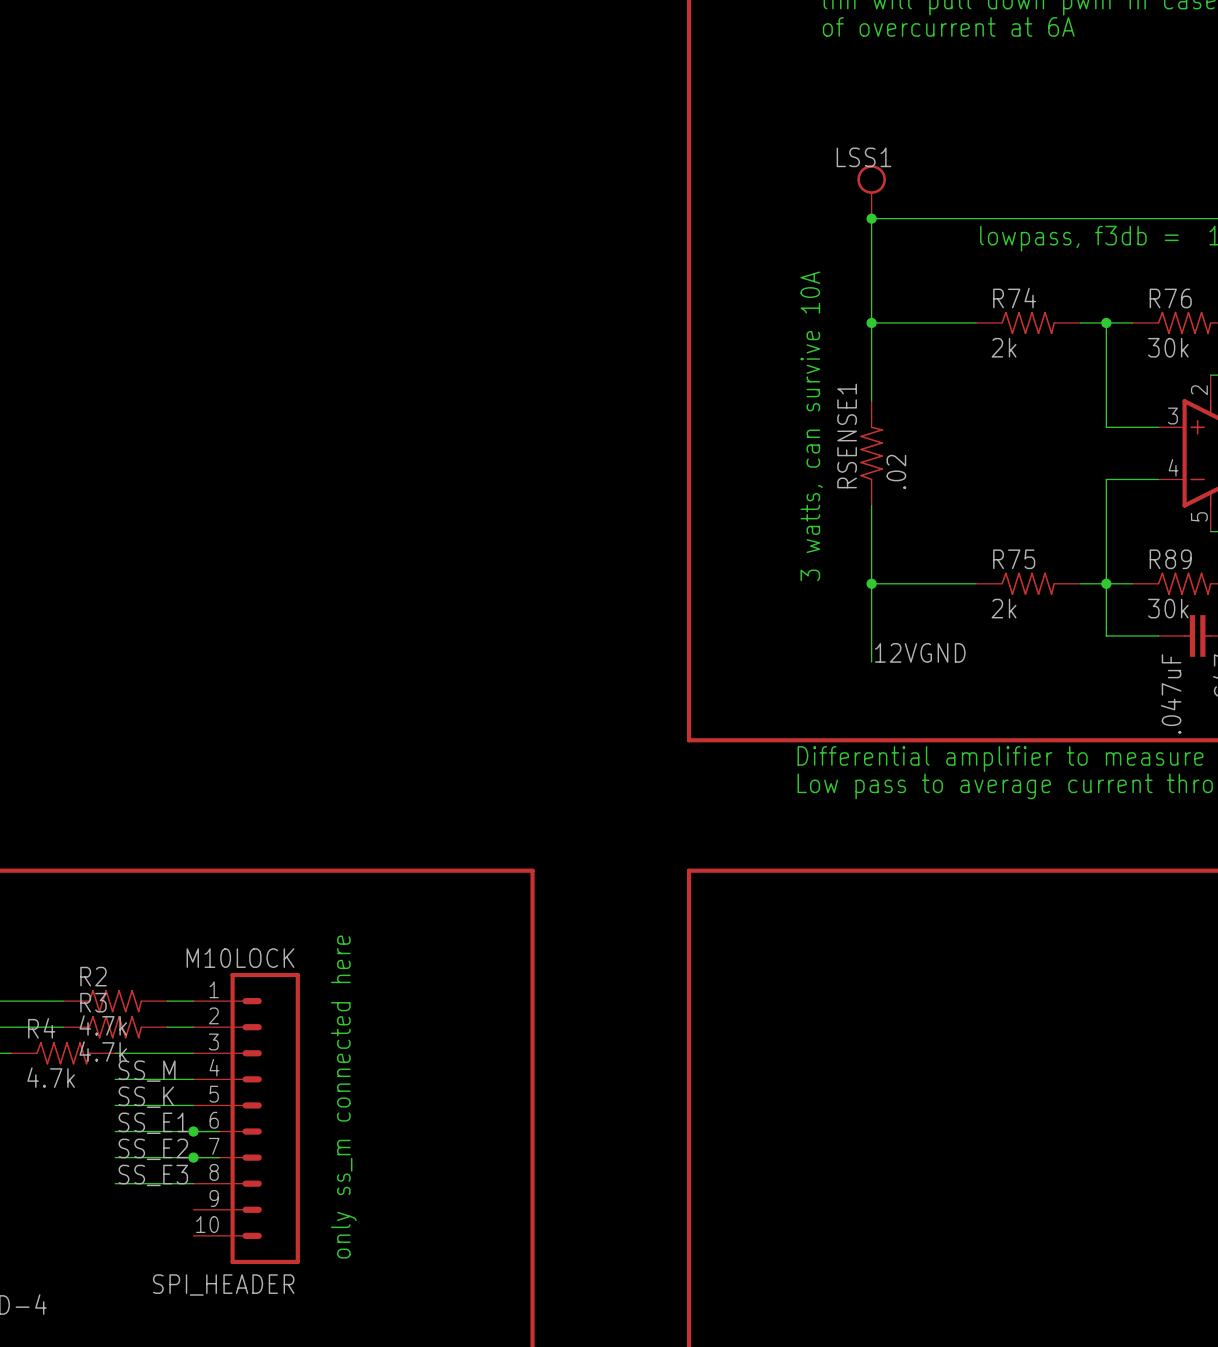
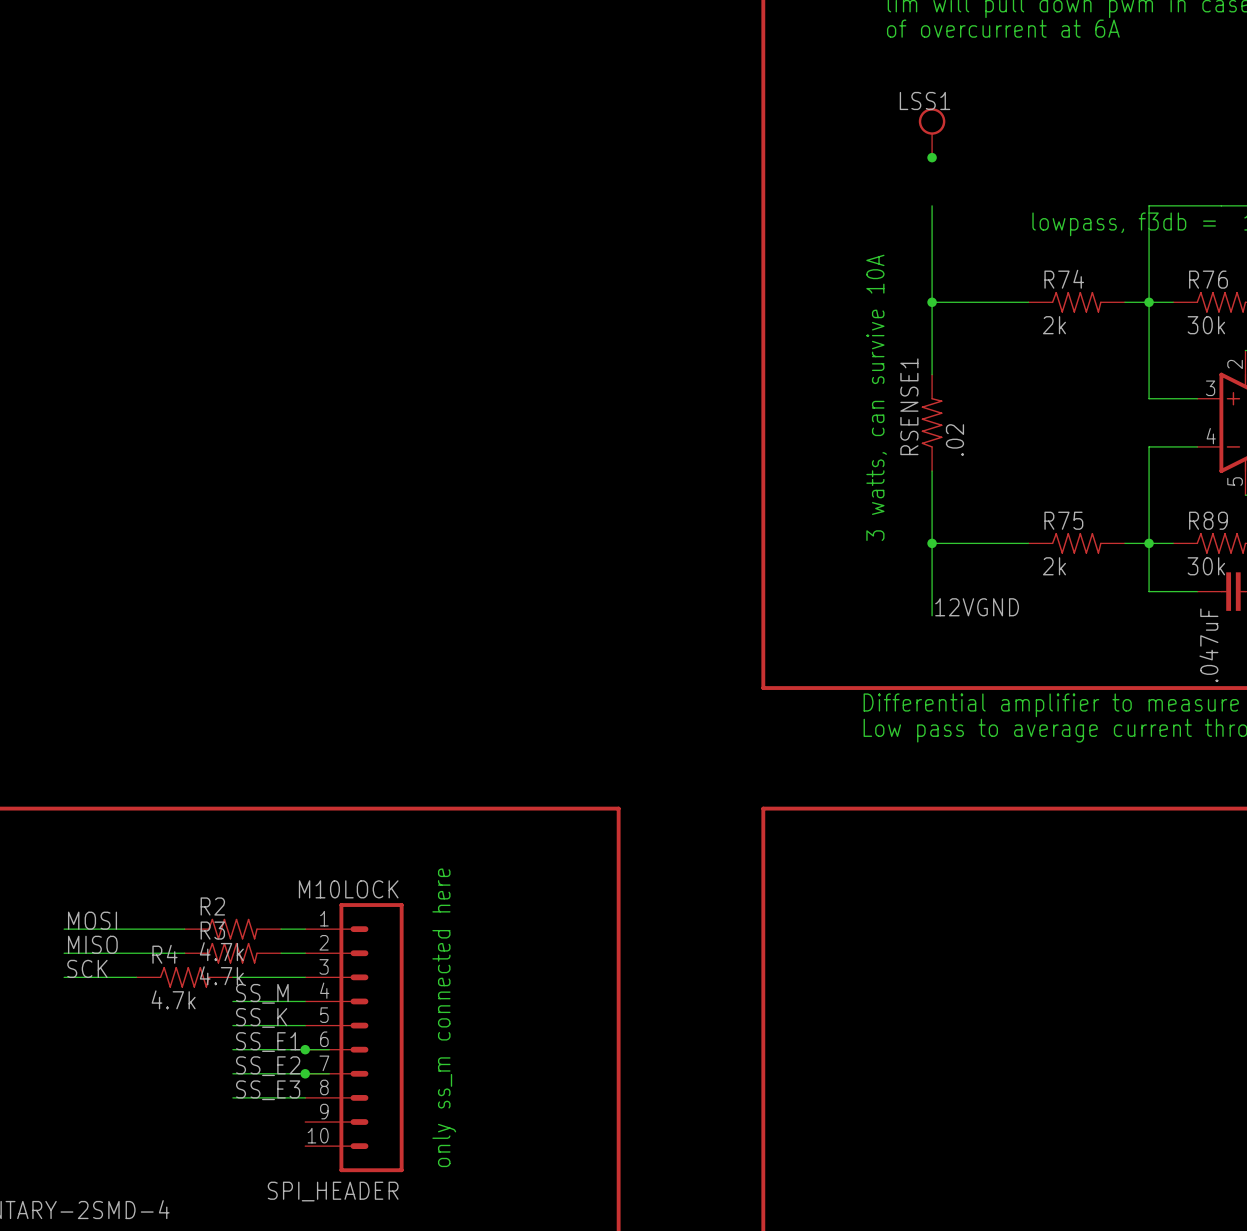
LSS1 position: (871, 191) -> (932, 132)
wire: (871, 218) (1106, 218) -> (1149, 302) (1149, 205)
junction position: (871, 218) -> (932, 157)

